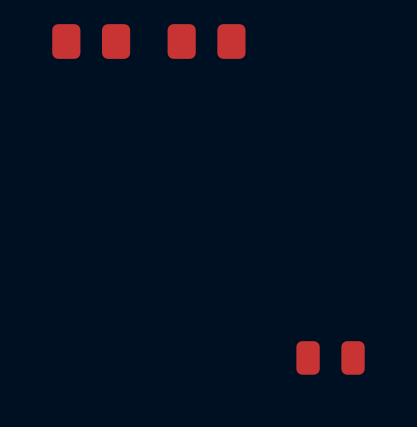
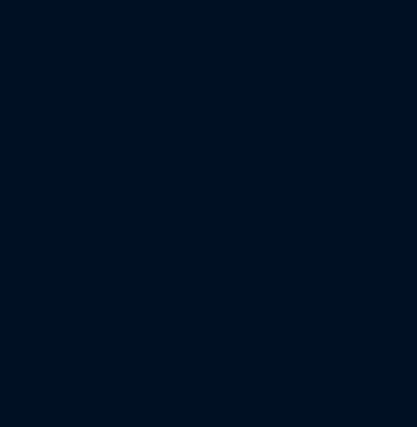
part: (91, 41) -> none
part: (206, 41) -> none
part: (330, 357) -> none

